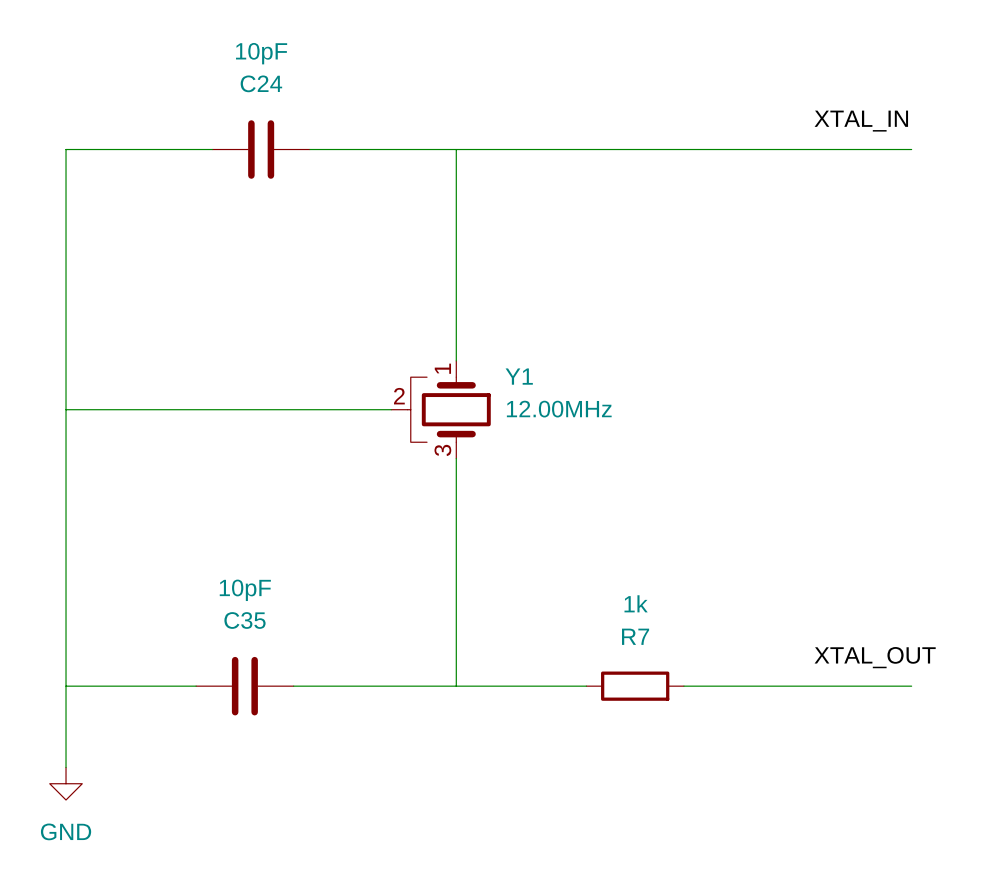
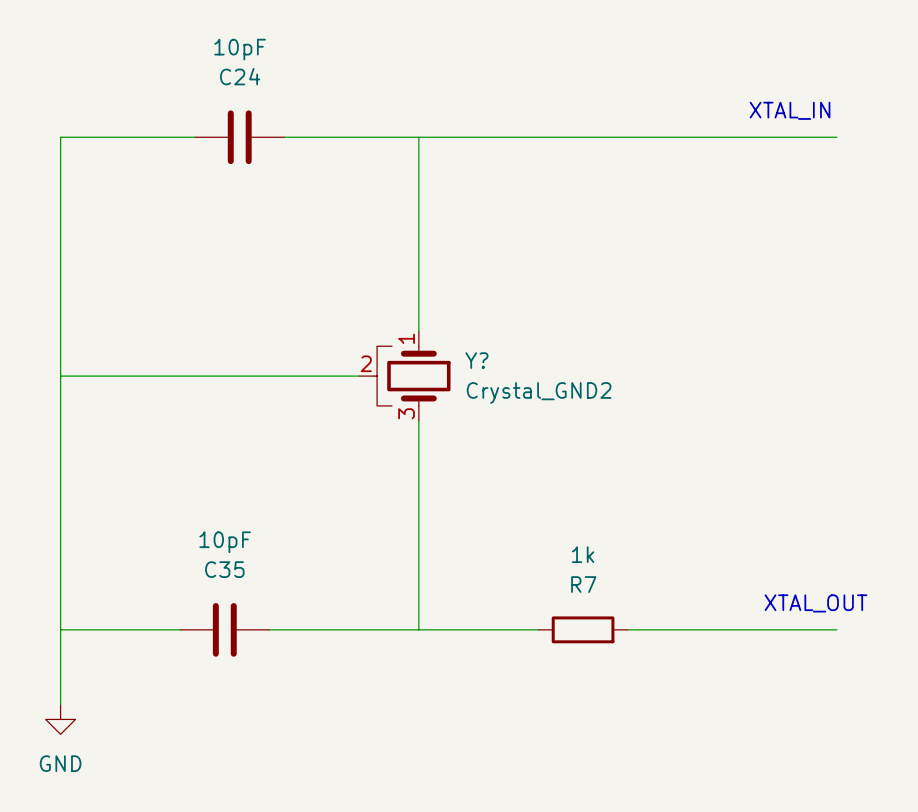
label: XTAL_IN (861, 121) -> none
text: none -> XTAL_IN (790, 110)
Y1 name: Y1 (519, 376) -> Y? (476, 360)
Y1 value: 12.00MHz (559, 409) -> Crystal_GND2 (539, 392)
label: XTAL_OUT (875, 657) -> none
text: none -> XTAL_OUT (815, 603)

